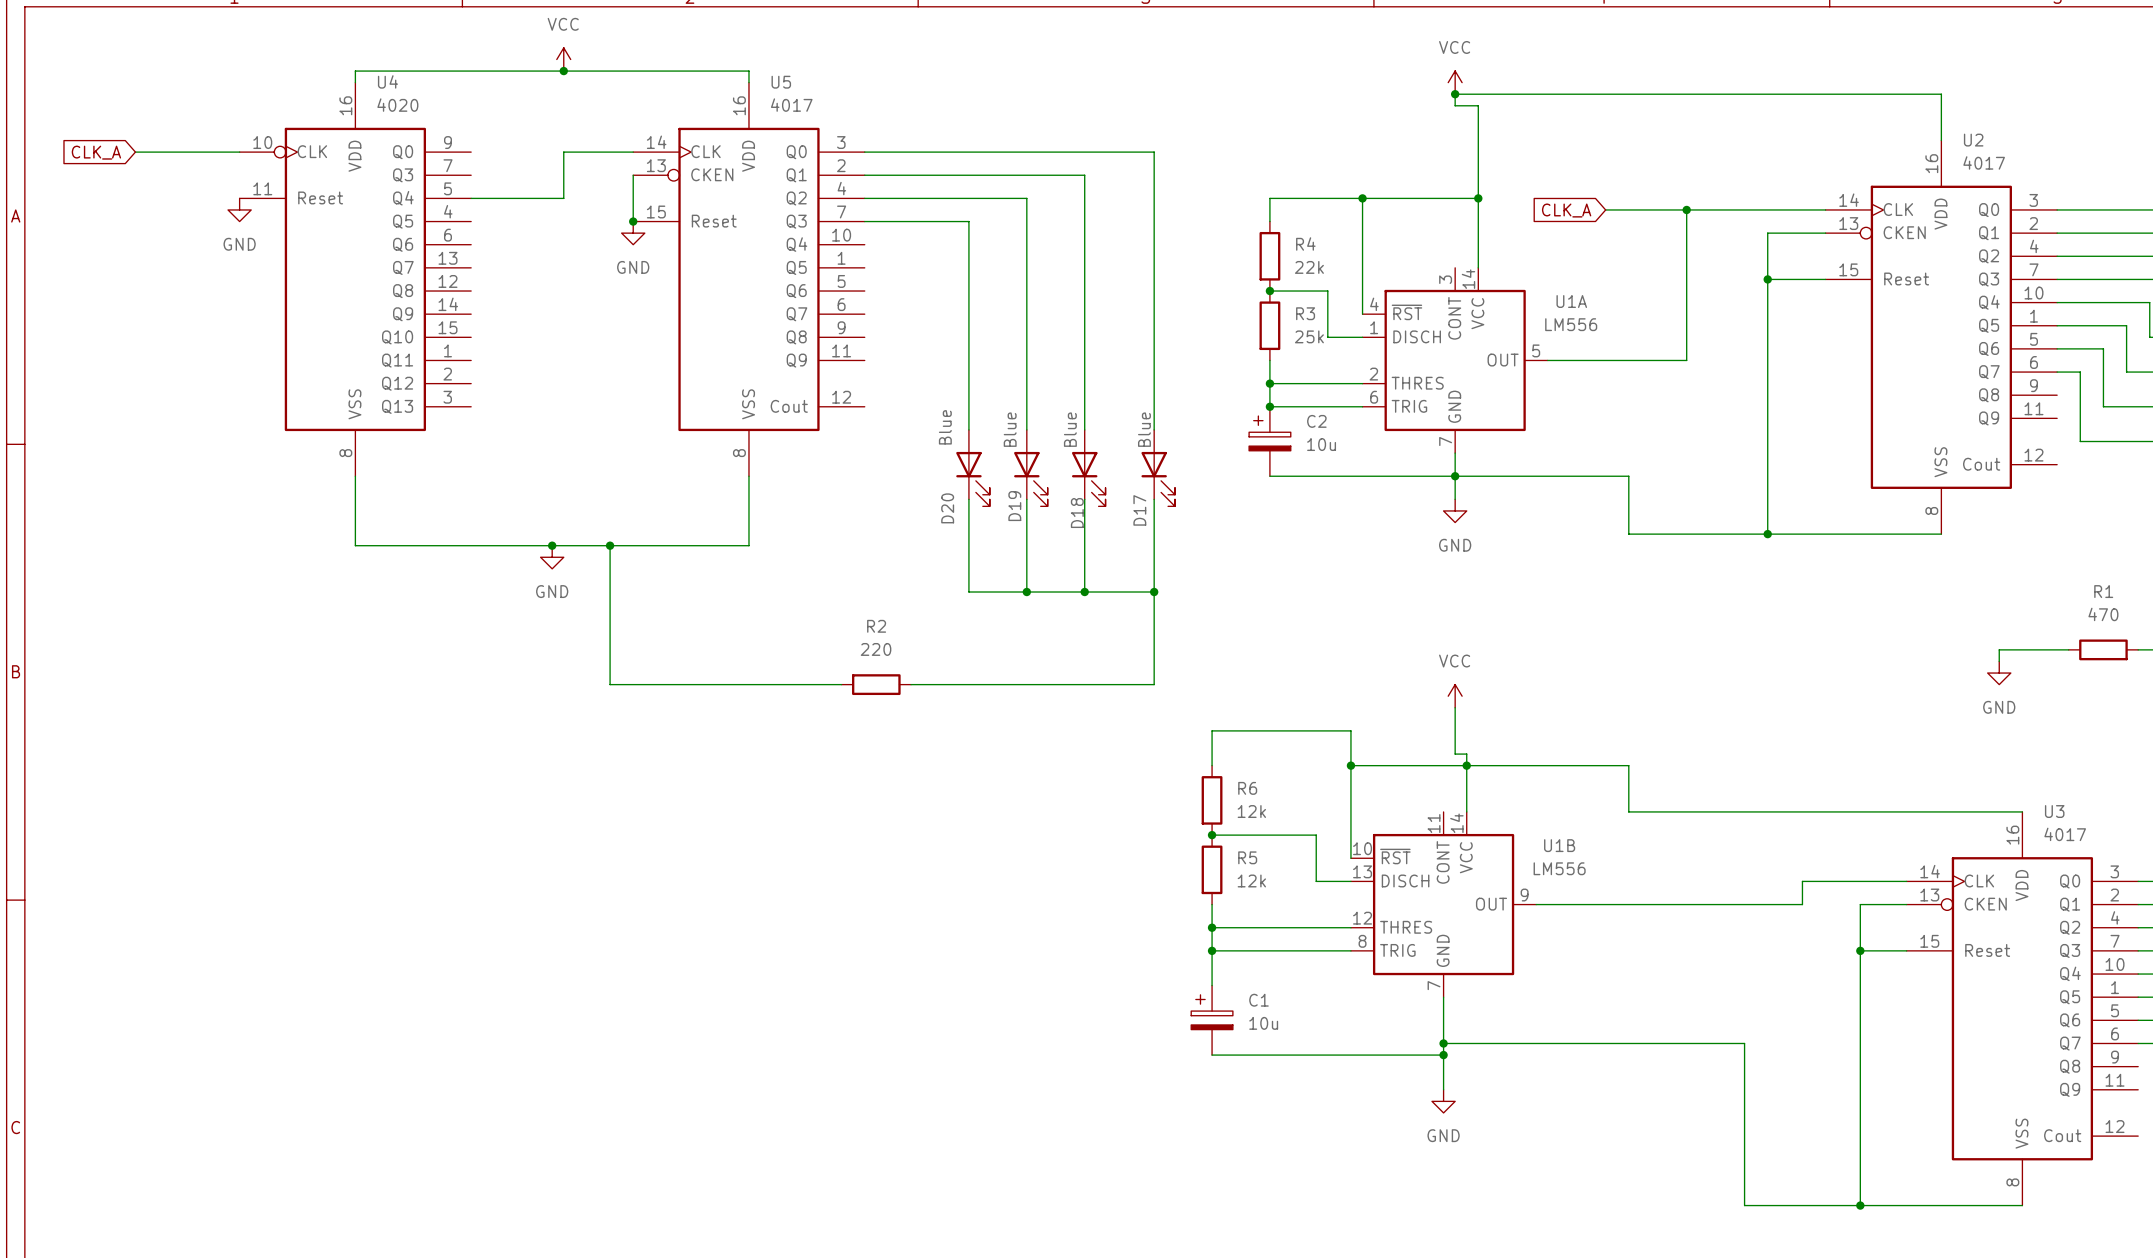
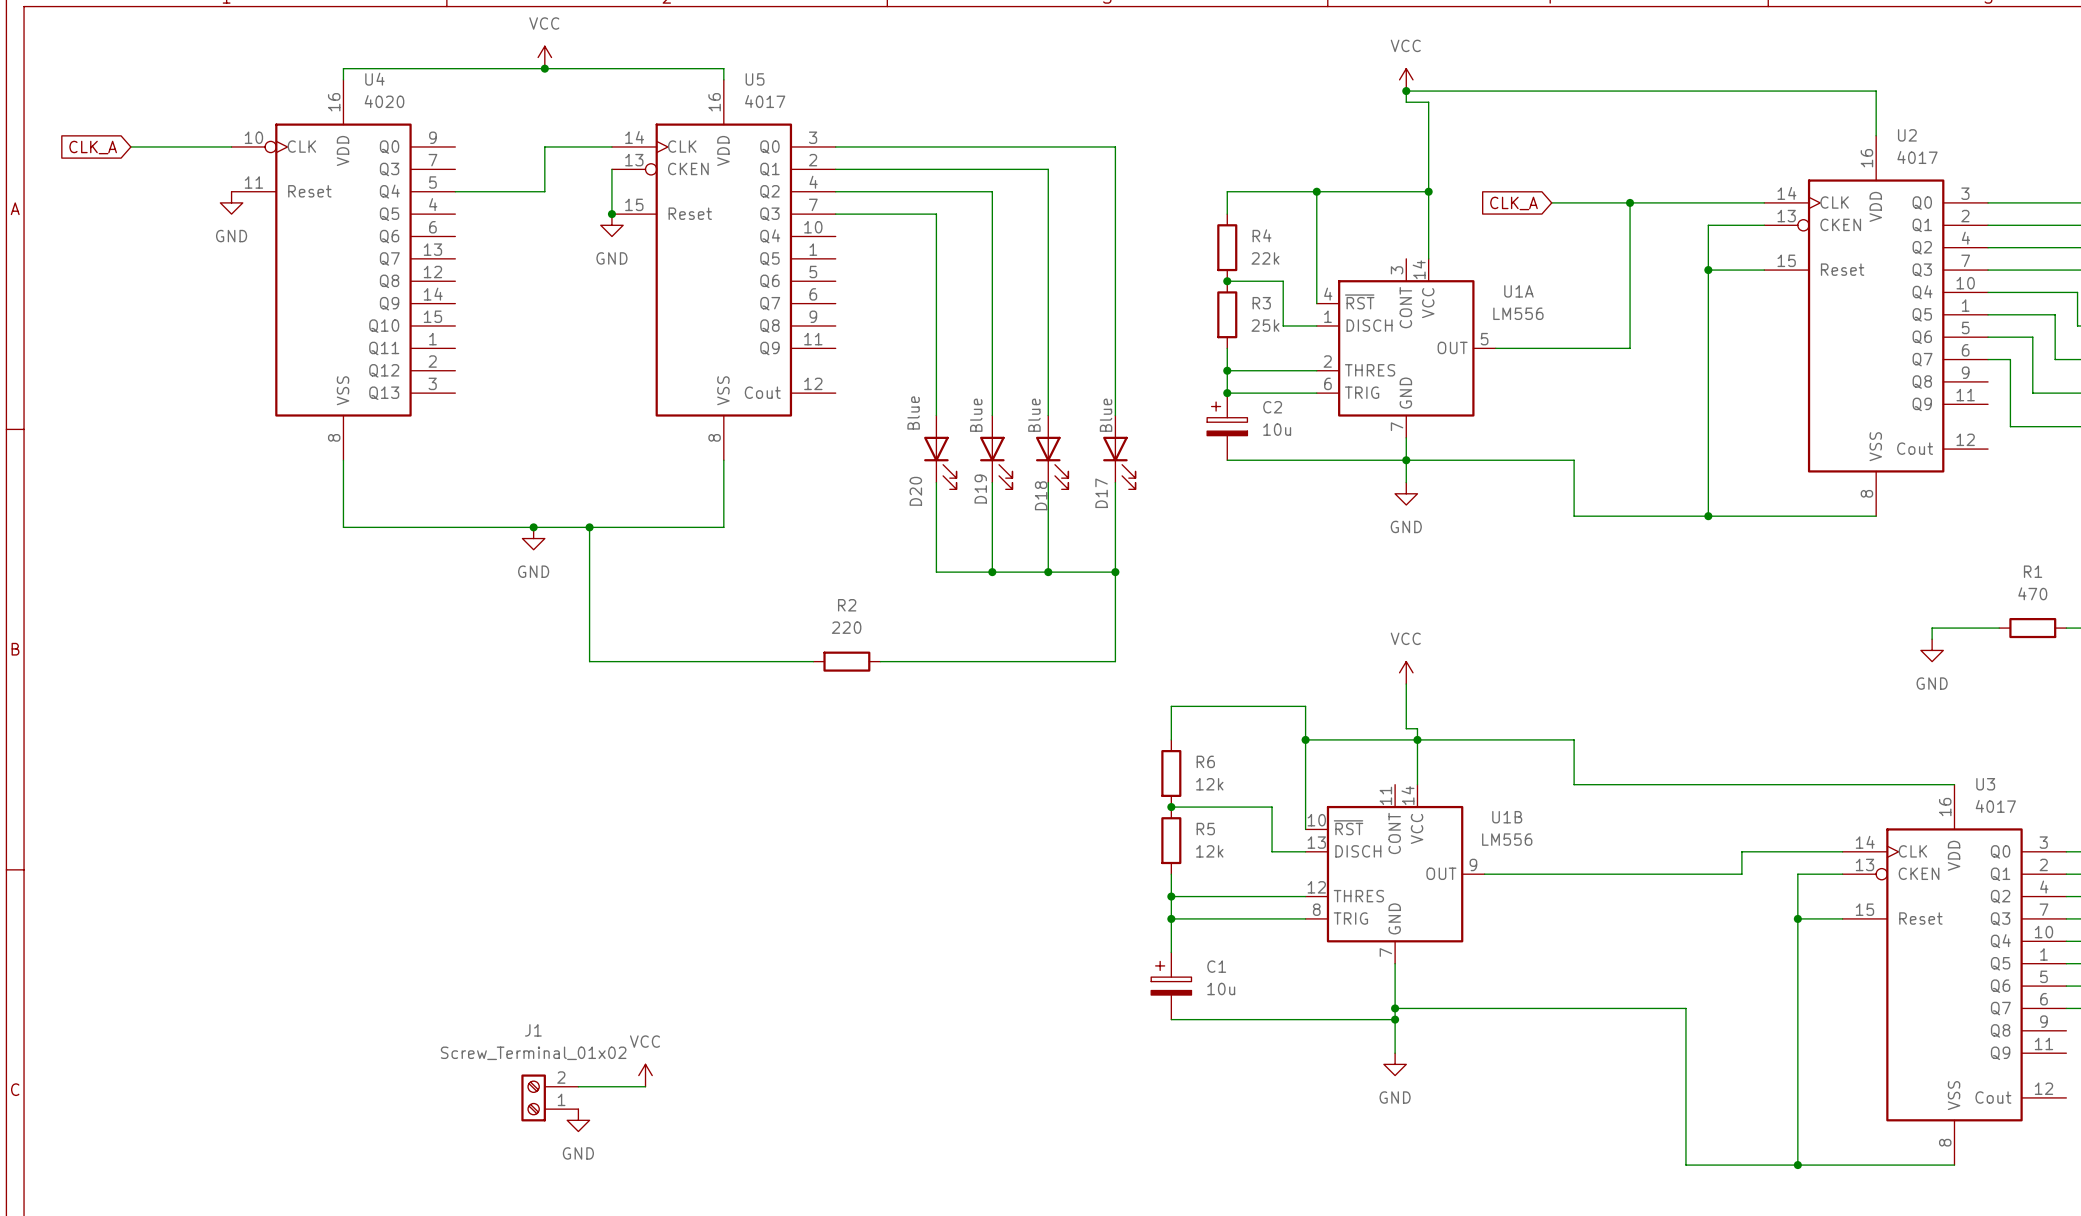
power symbol: none -> VCC (645, 1075)
wire: none -> (578, 1086) (645, 1086)
J1: none -> Screw_Terminal_01x02 (549, 1097)
power symbol: none -> GND (578, 1120)

